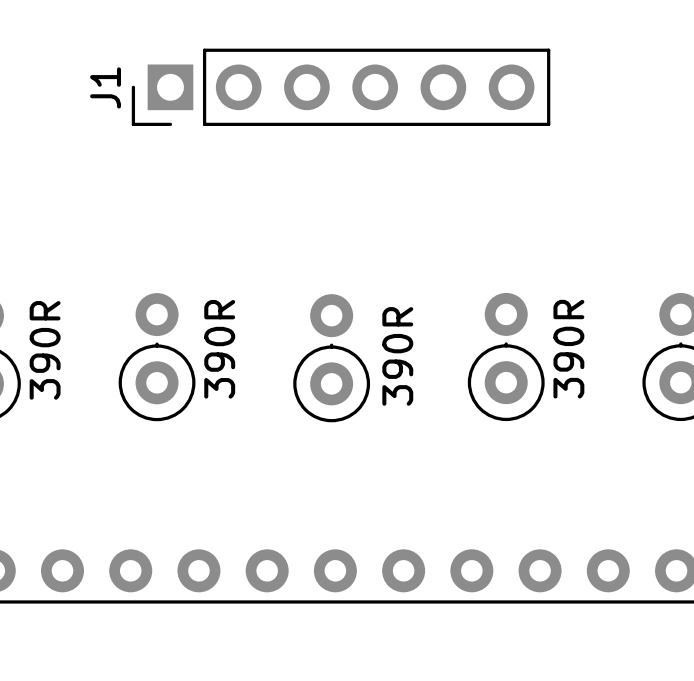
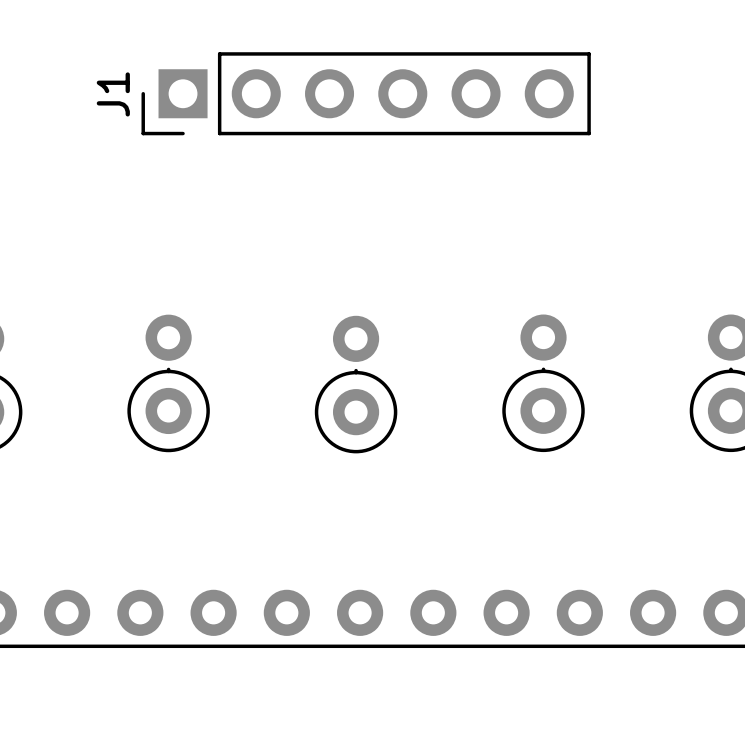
part value: 390R (219, 349) -> none
part value: 390R (568, 349) -> none
part value: 390R (45, 350) -> none
part value: 390R (397, 356) -> none

